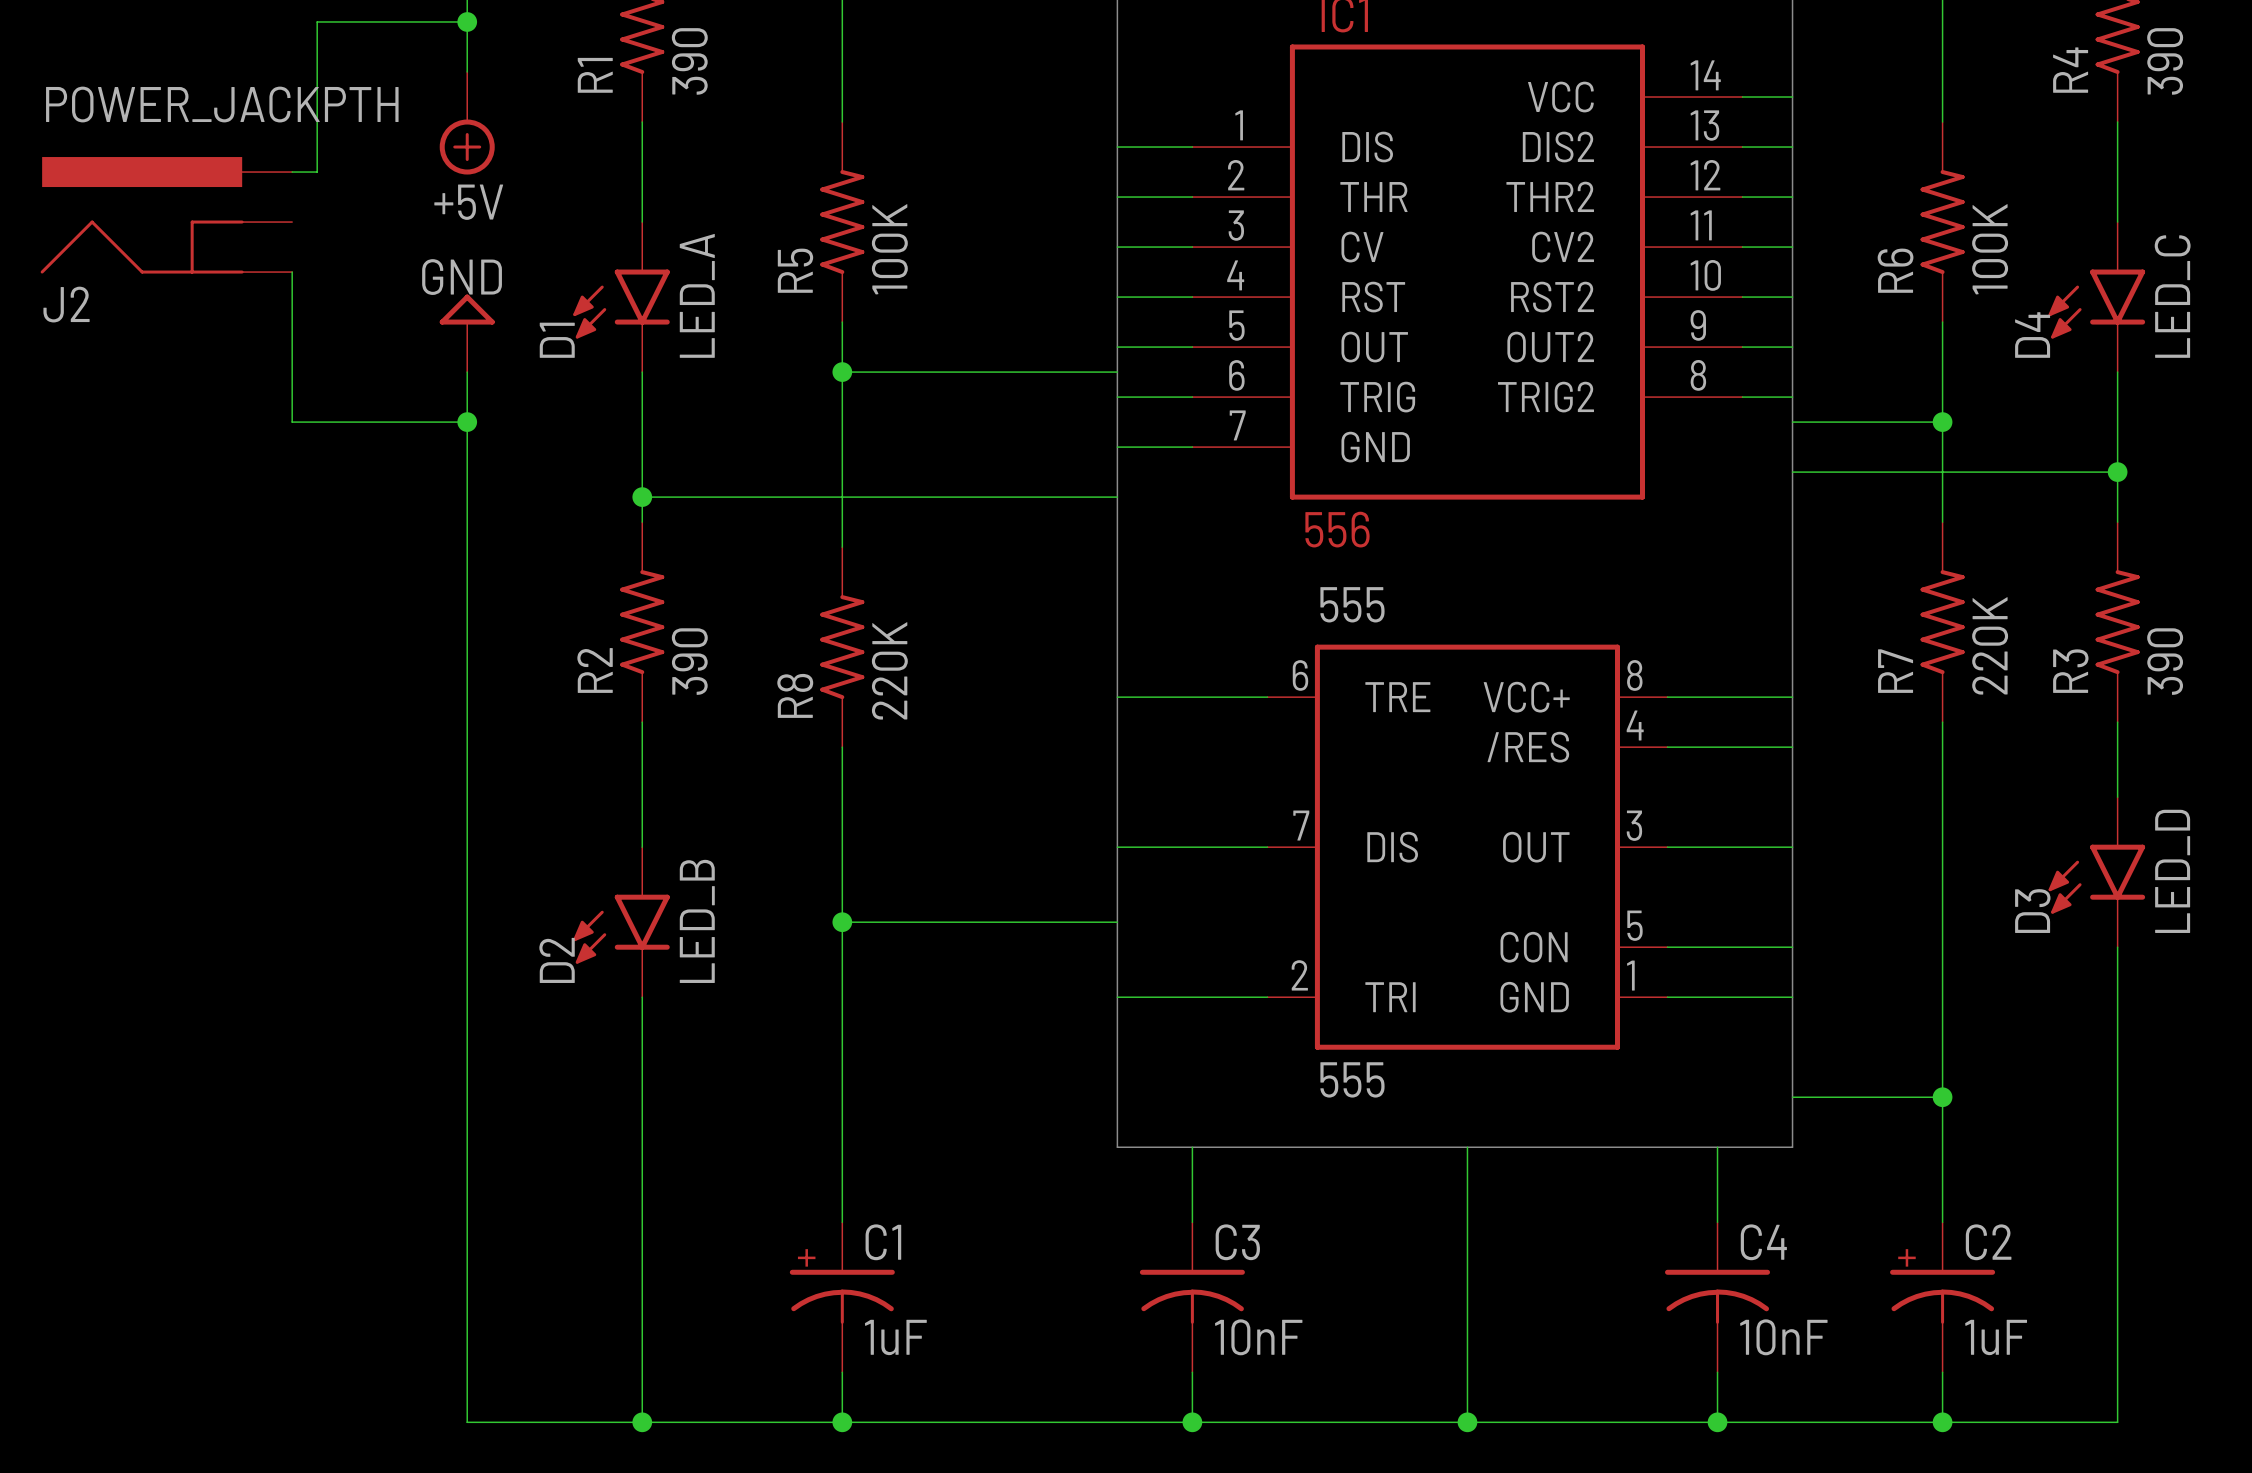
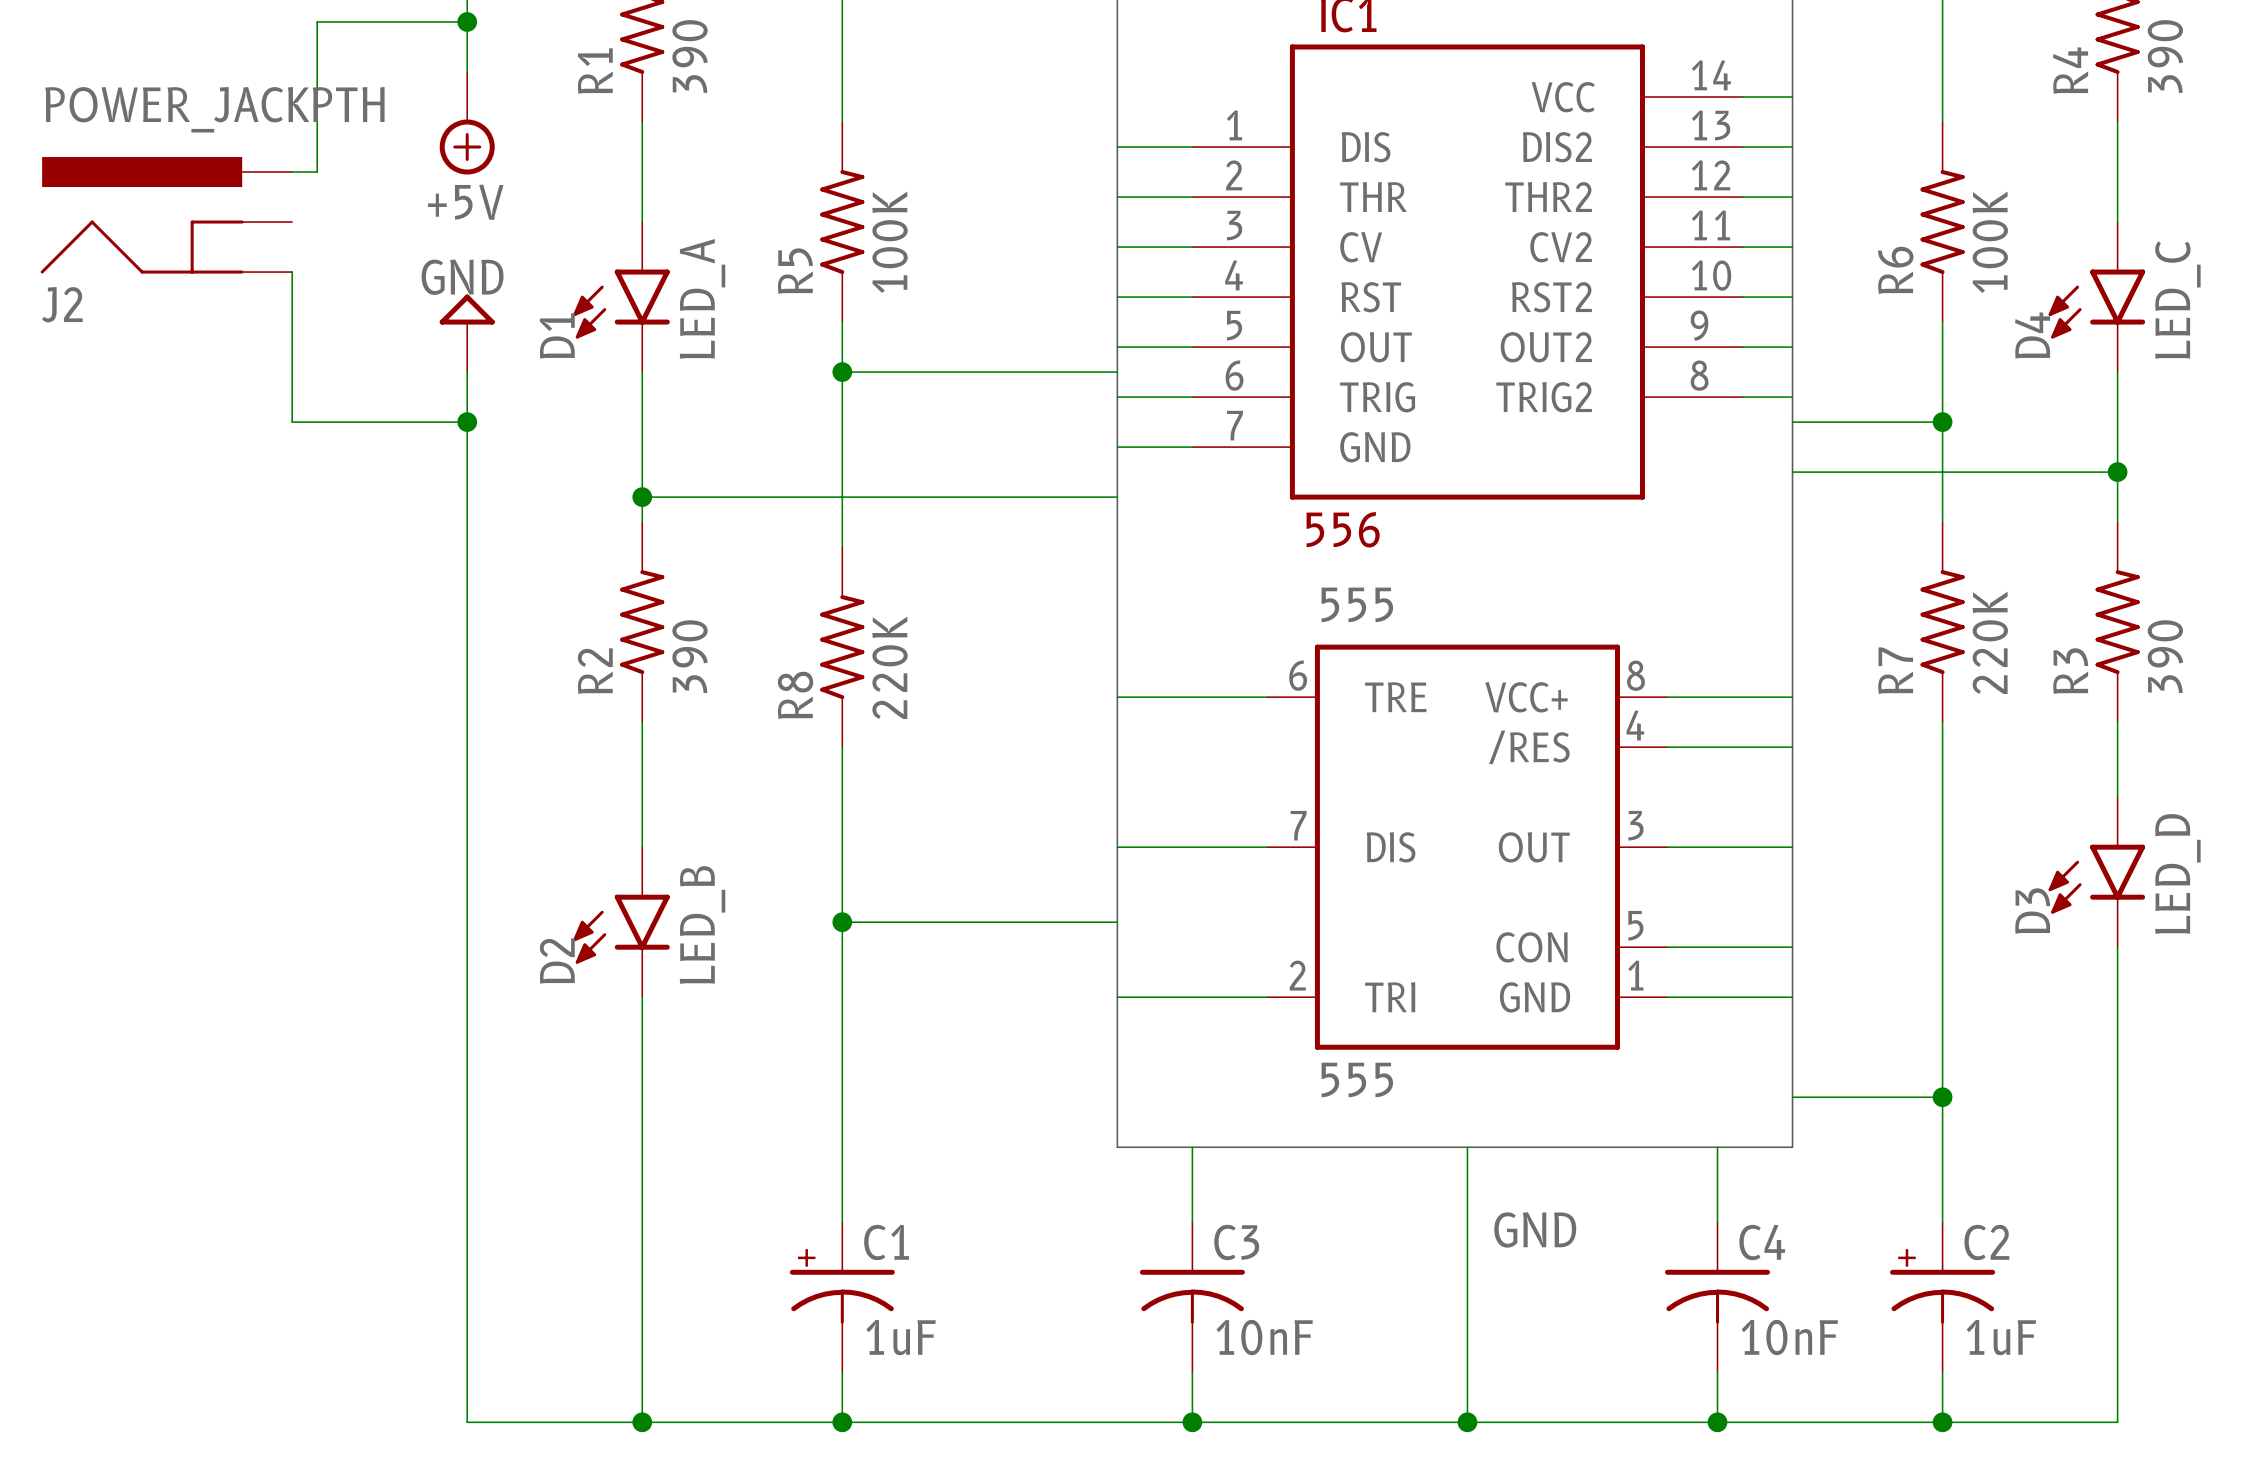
label: none -> GND (1535, 1229)

